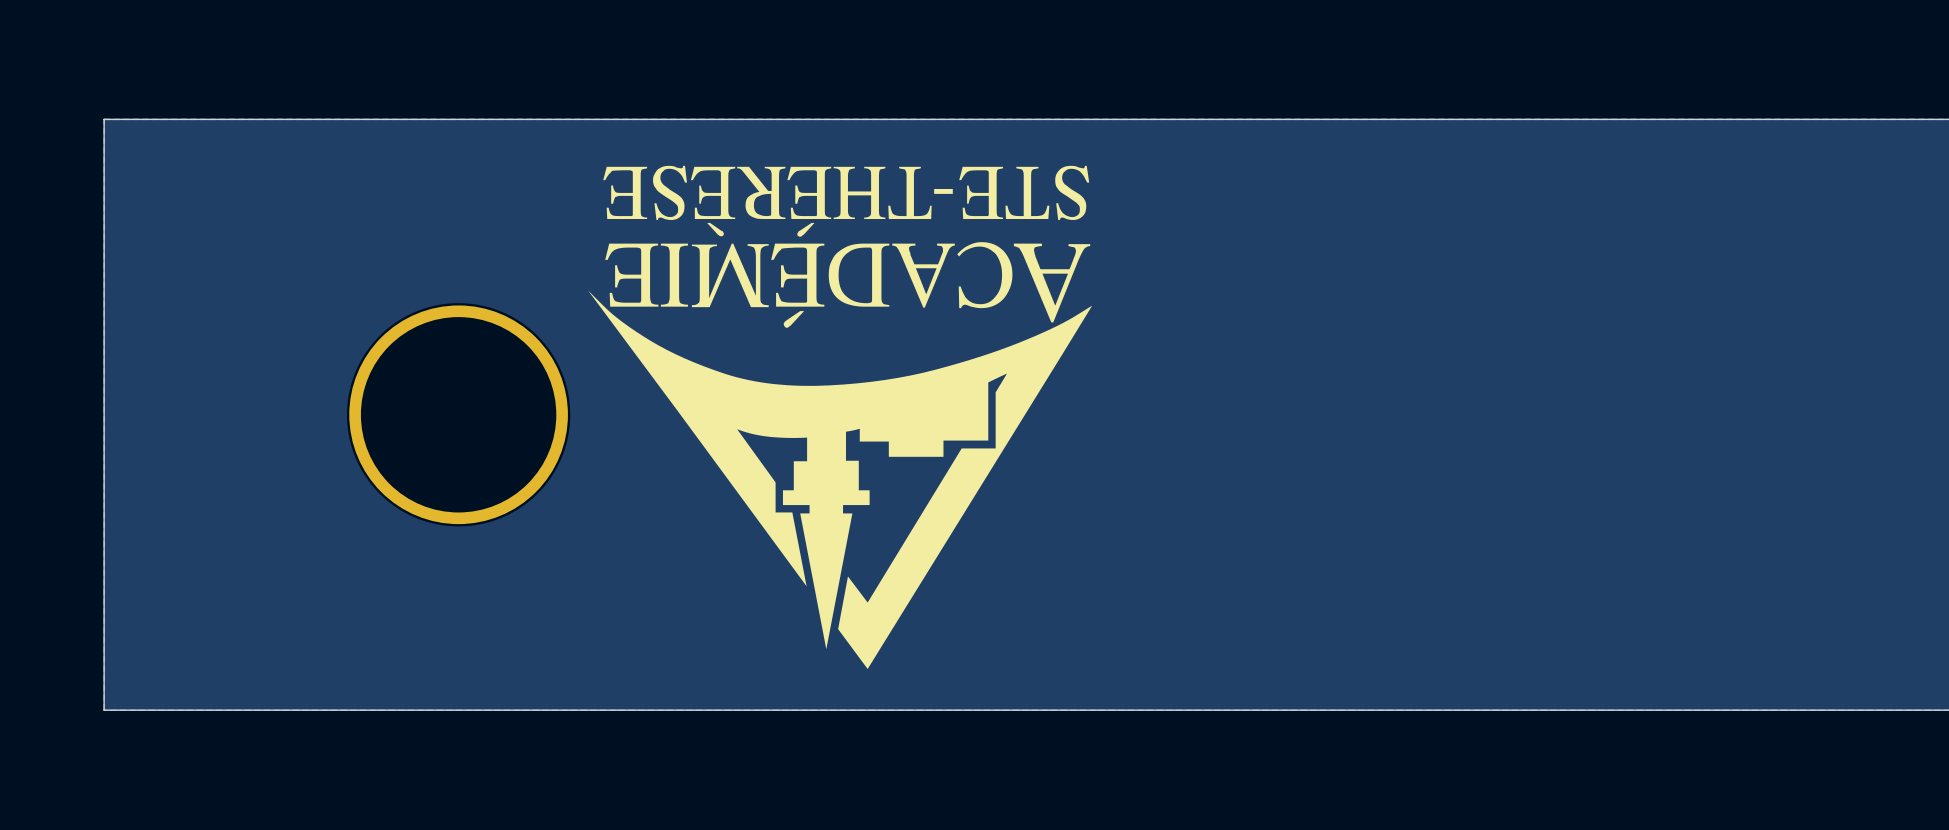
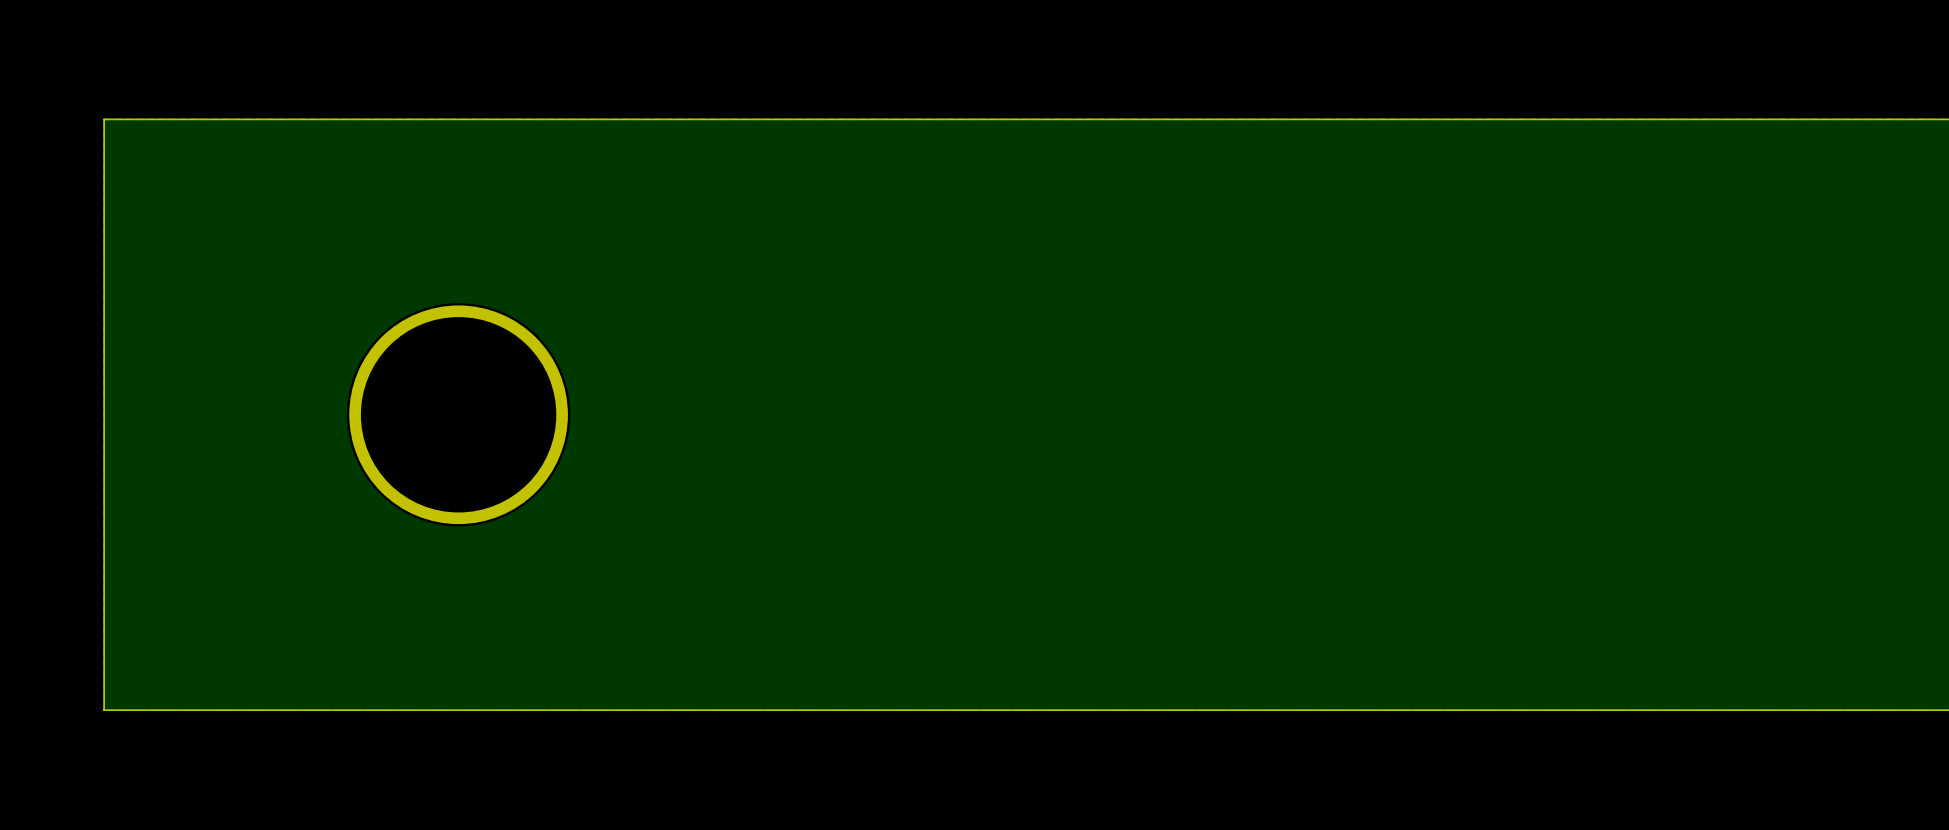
drawing: [588, 165, 1093, 670] -> none

